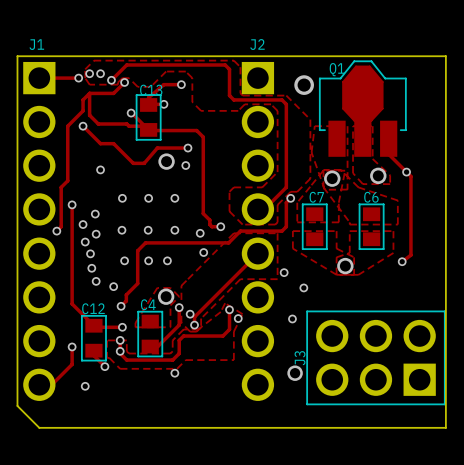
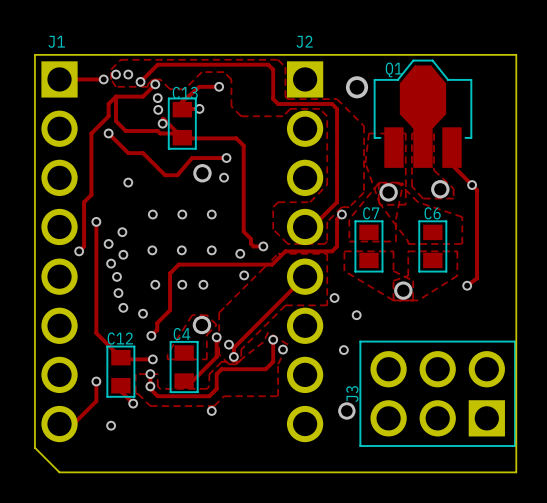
via: none -> (157, 98)
via: none -> (158, 109)
via: (131, 113) -> none
via: none -> (162, 123)

